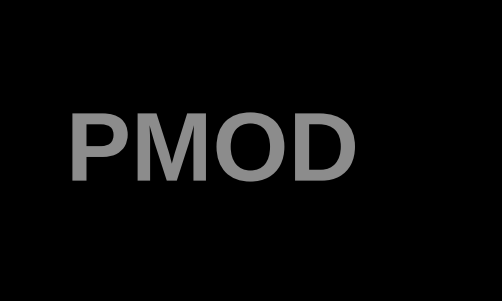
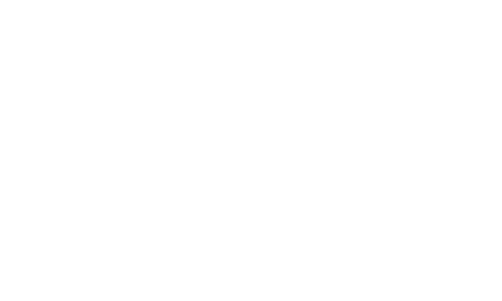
text: PMOD (213, 146) -> none

